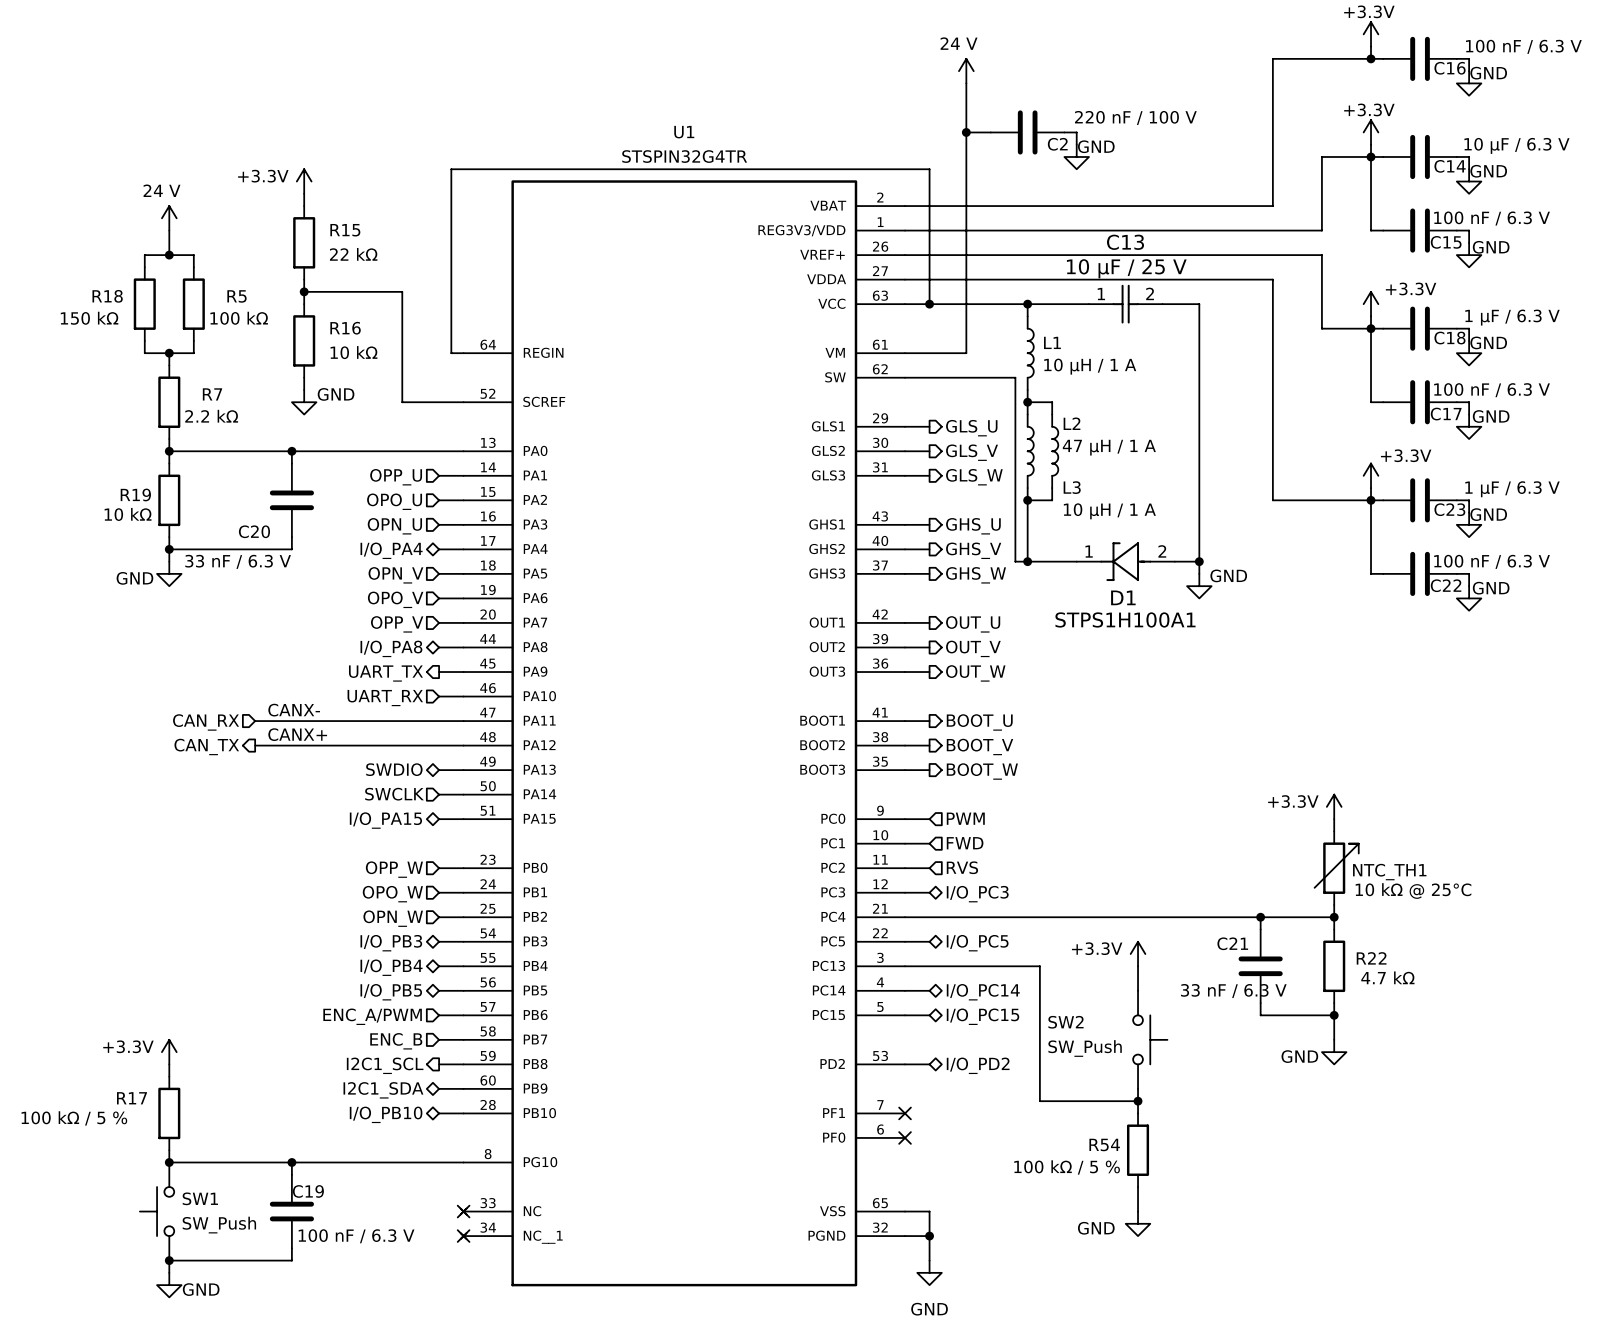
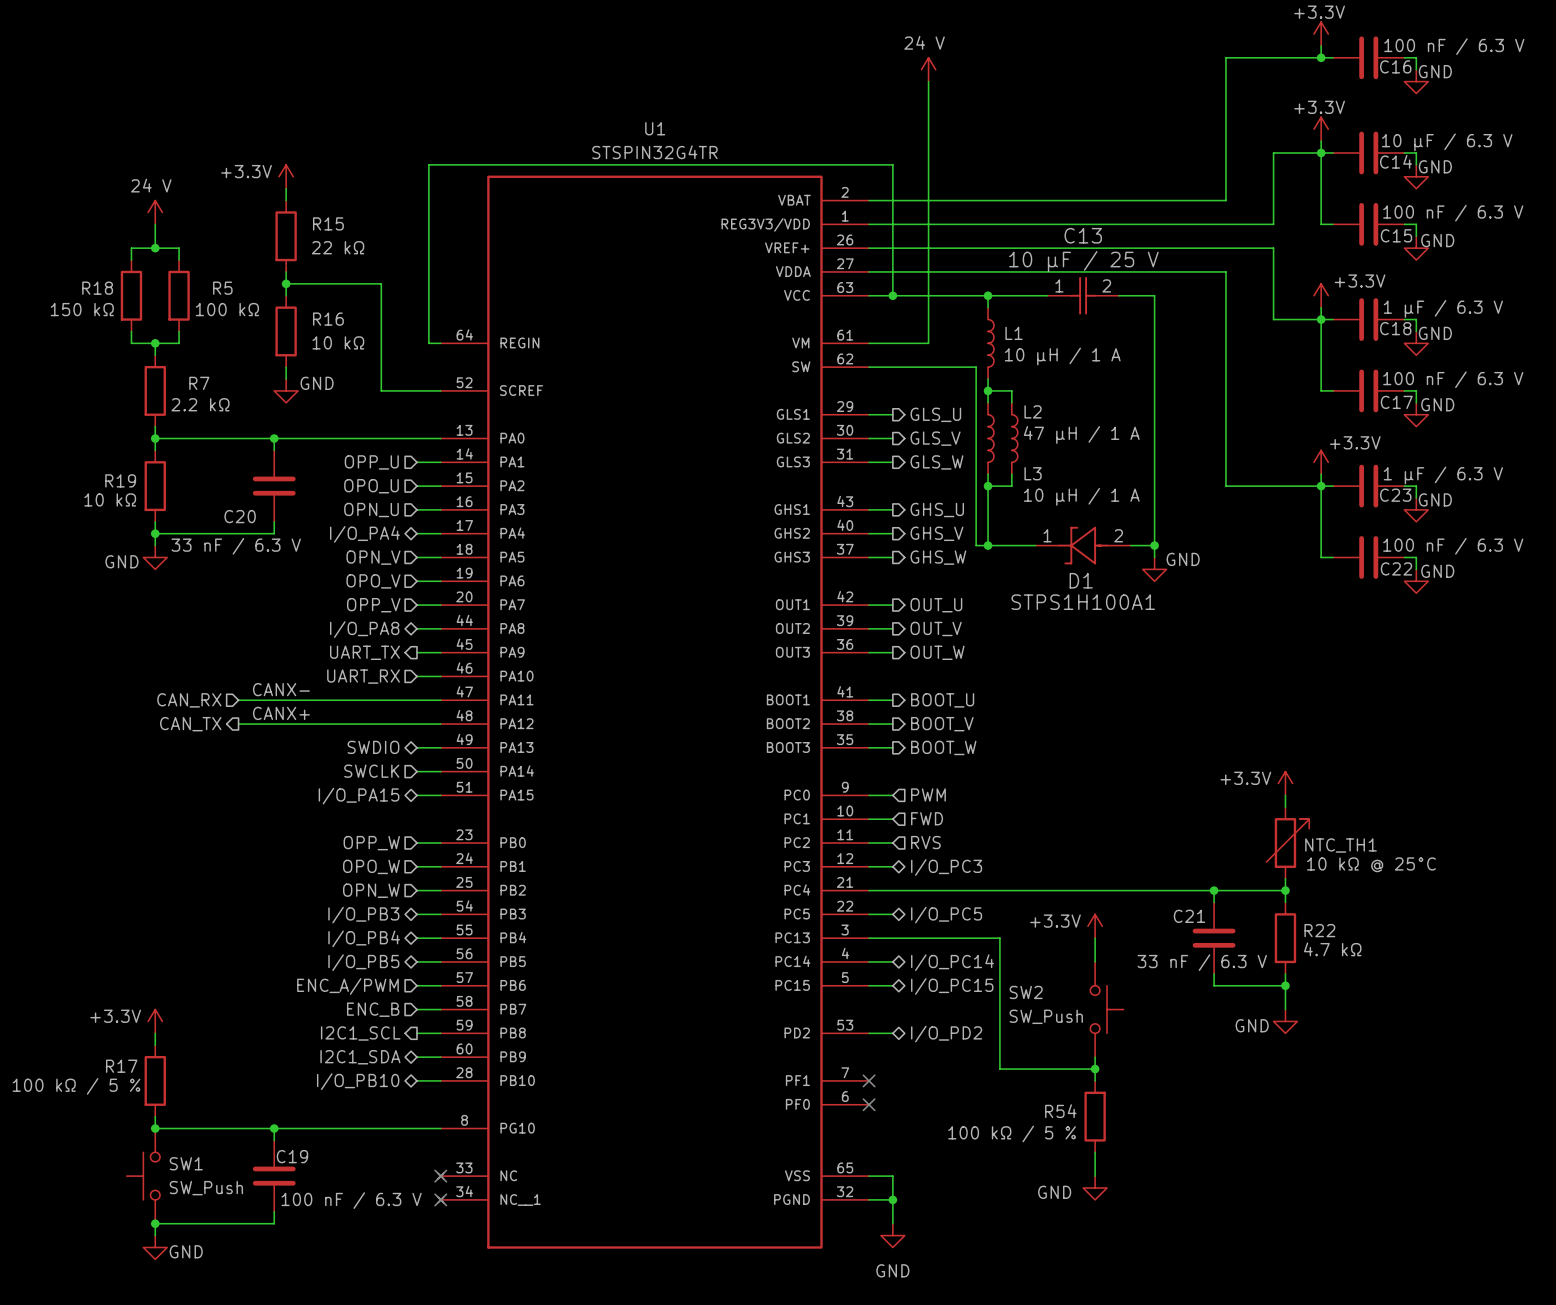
wire: (966, 132) (990, 132) -> none
junction: (966, 132) -> none
C2: 220 nF / 100 V (1027, 132) -> none
wire: (1064, 132) (1076, 132) (1076, 144) -> none
power symbol: GND (1076, 156) -> none

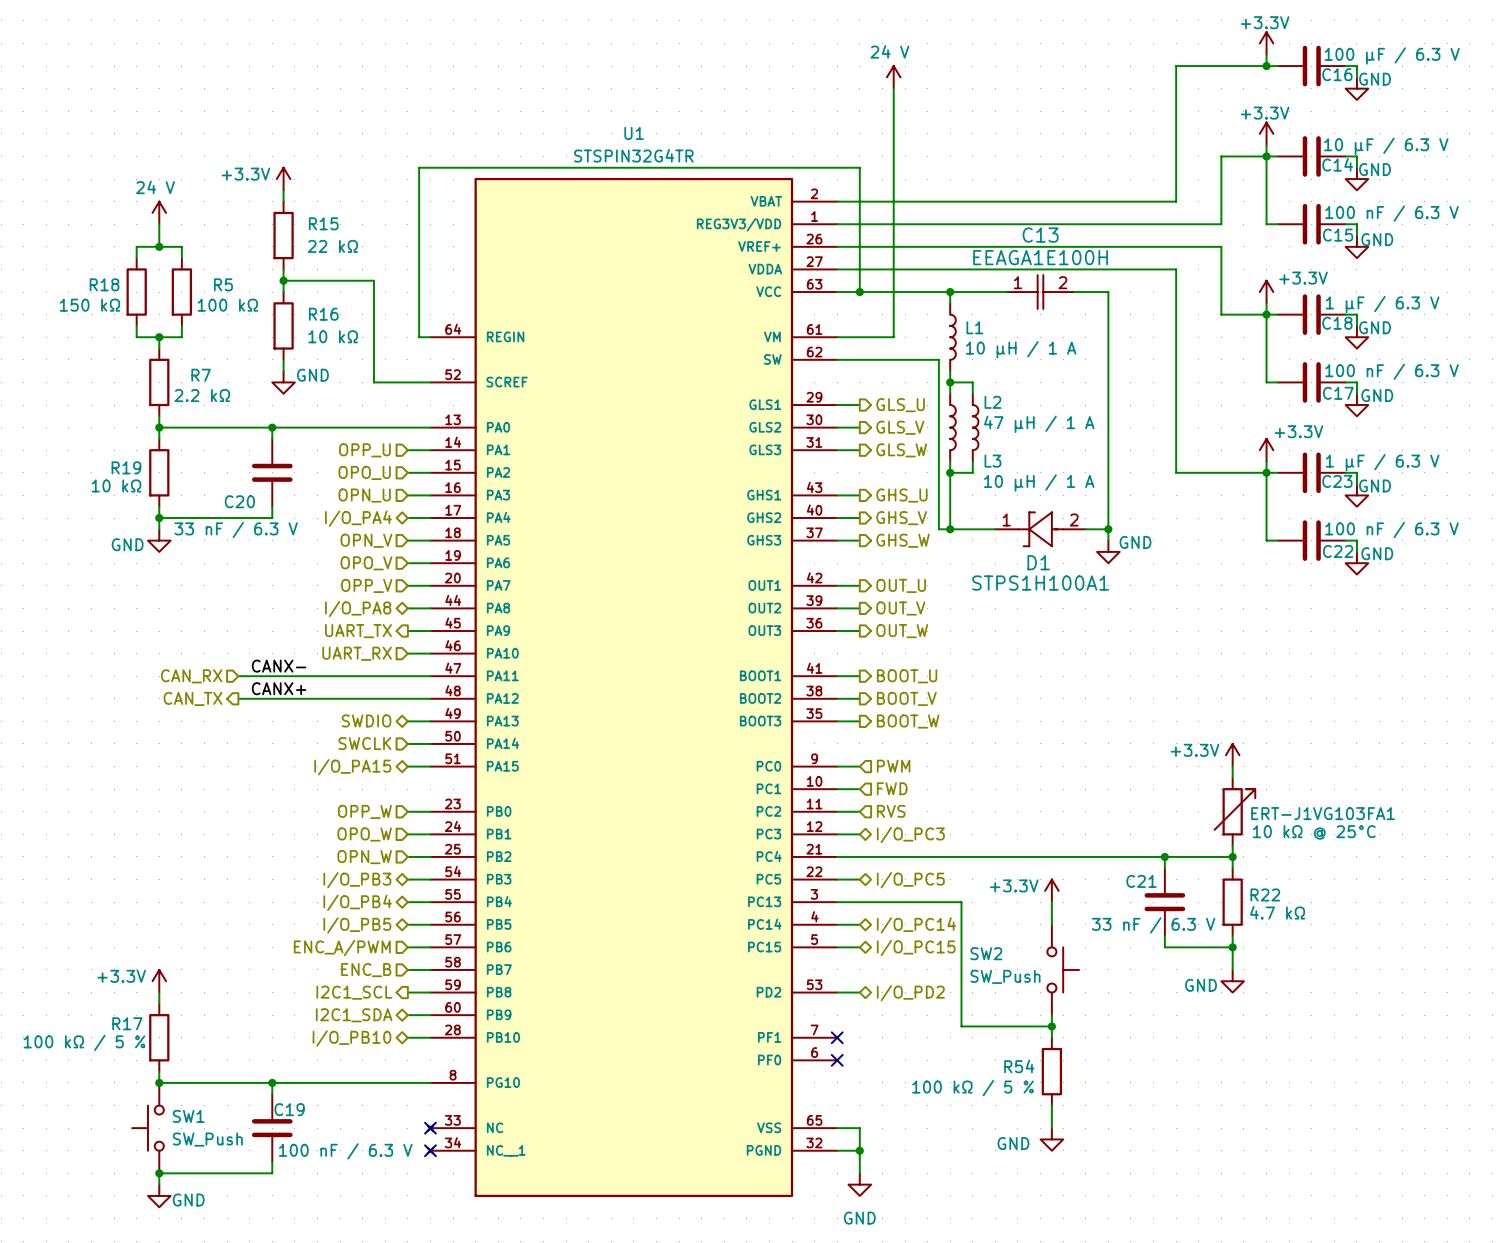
C16 value: 100 nF / 6.3 V (1454, 46) -> 100 μF / 6.3 V (1392, 55)
C13 value: 10 µF / 25 V (1083, 261) -> EEAGA1E100H (1040, 257)
NTC_TH1 name: NTC_TH1 (1341, 845) -> ERT-J1VG103FA1 (1323, 813)

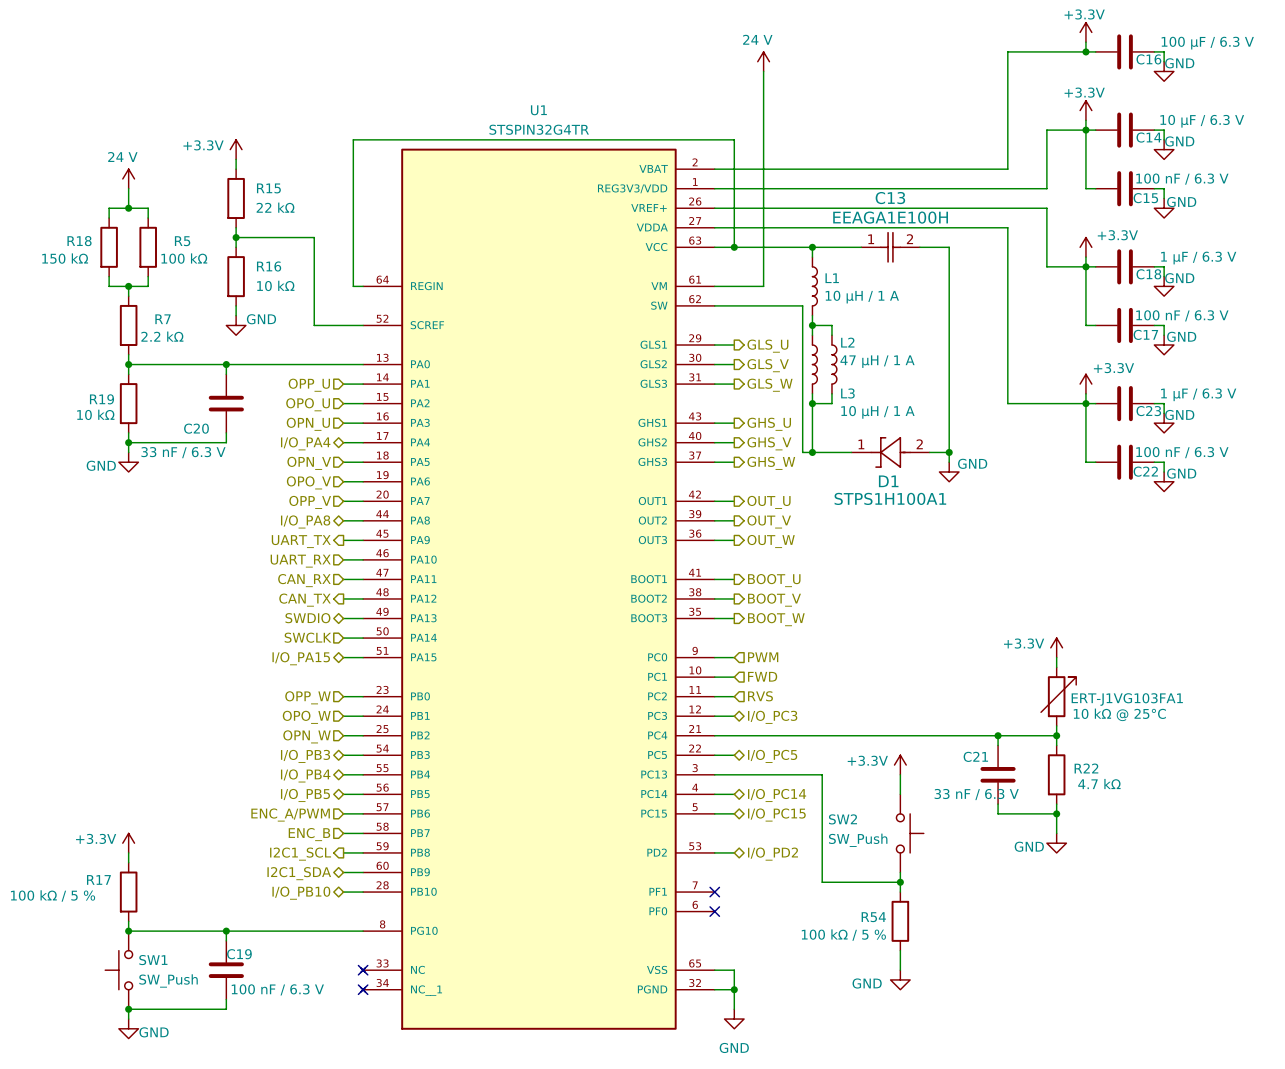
label: CANX- (279, 666) -> none
hierarchical label position: CAN_RX (191, 676) -> CAN_RX (304, 580)
wire: (238, 676) (407, 676) -> none
label: CANX+ (279, 688) -> none
hierarchical label position: CAN_TX (193, 698) -> CAN_TX (305, 600)
wire: (238, 698) (407, 698) -> none

